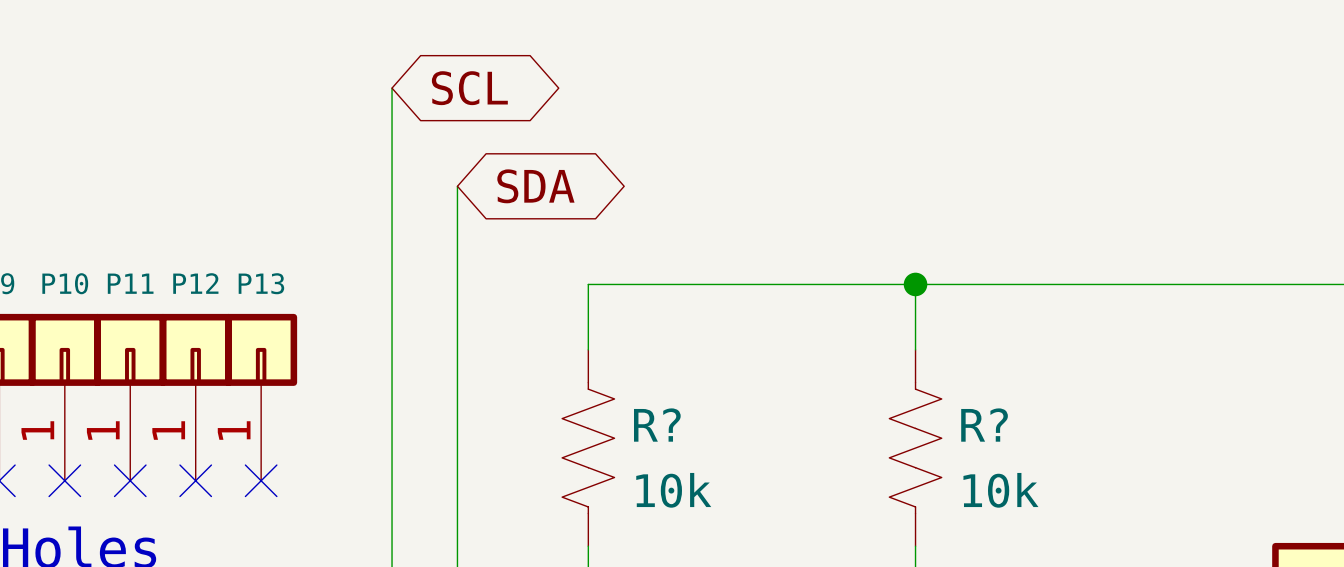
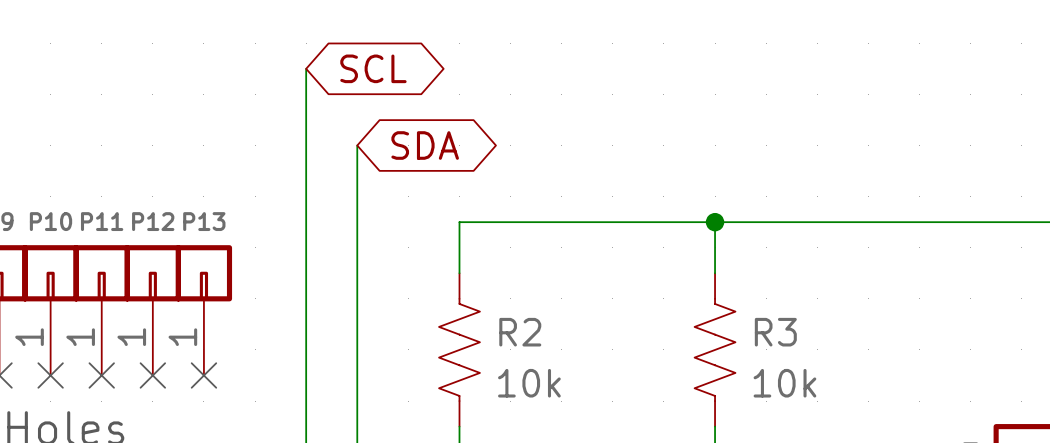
R? name: R? (657, 425) -> R2 (520, 332)
R? name: R? (984, 425) -> R3 (775, 332)

